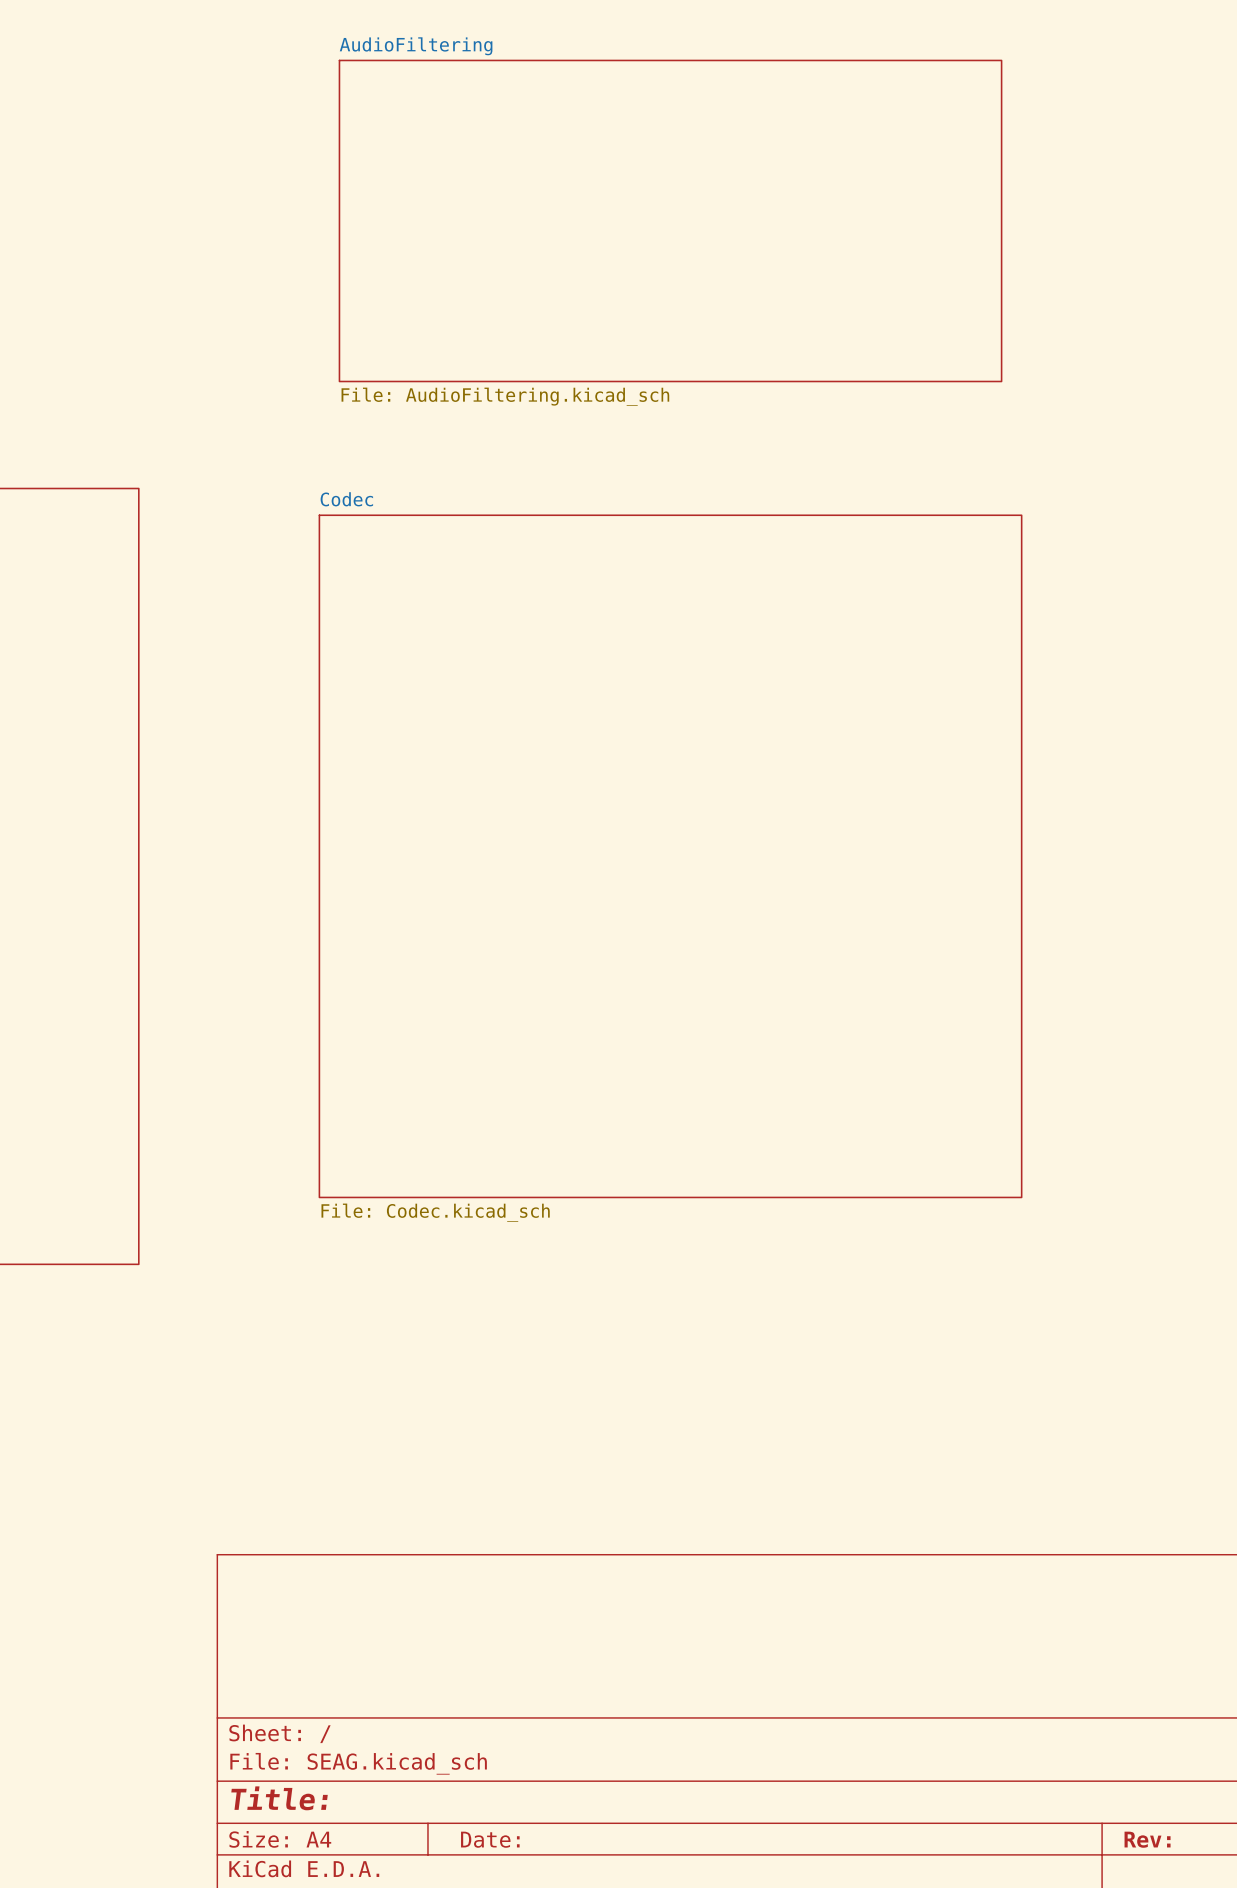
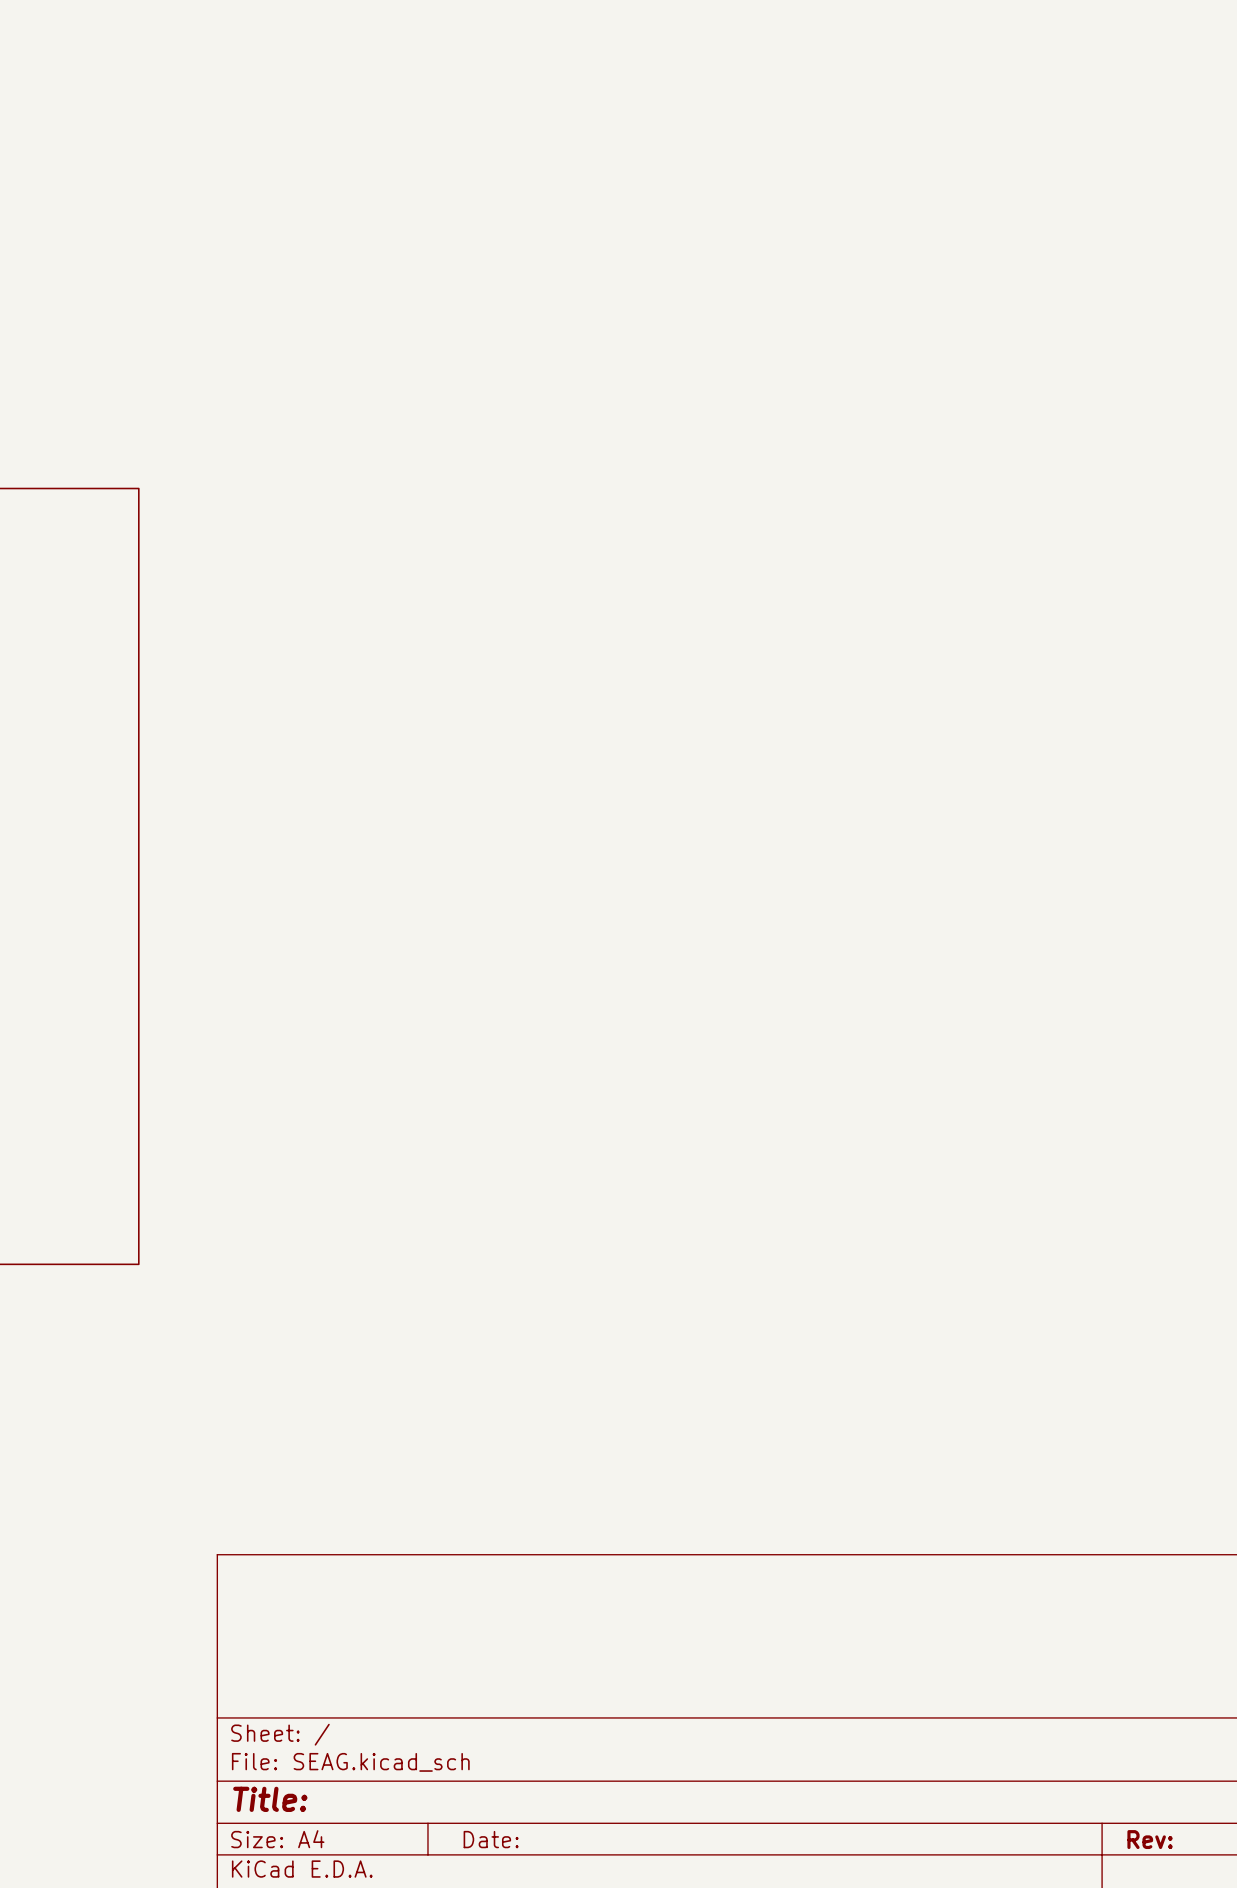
sheet AudioFiltering: File: AudioFiltering.kicad_sch (670, 220) -> none
sheet Codec: File: Codec.kicad_sch (670, 856) -> none

